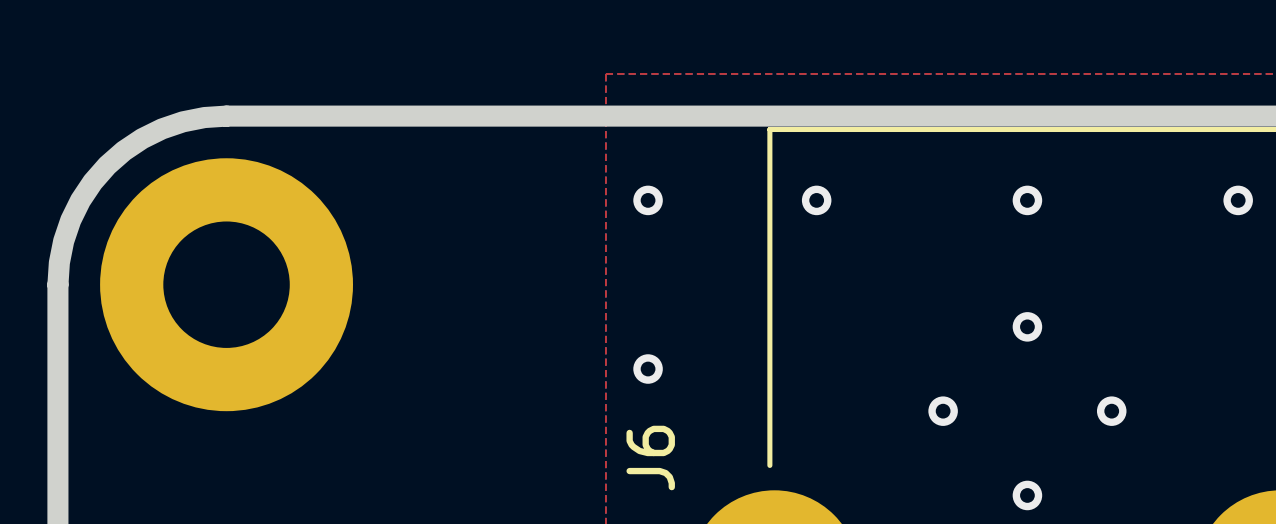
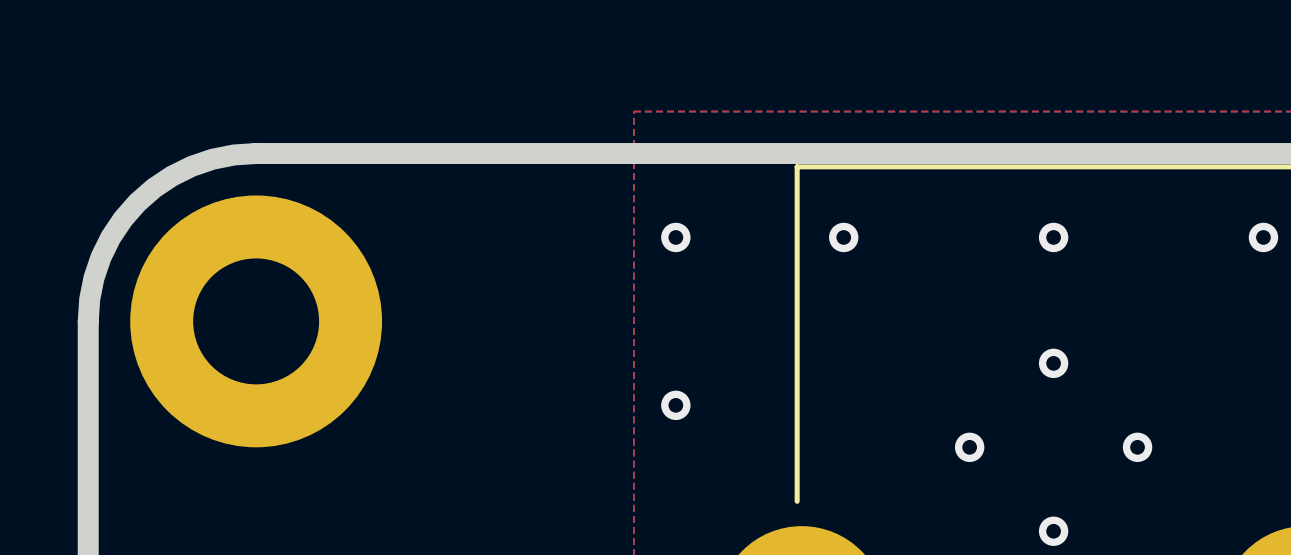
J6 name: J6 (650, 458) -> none

